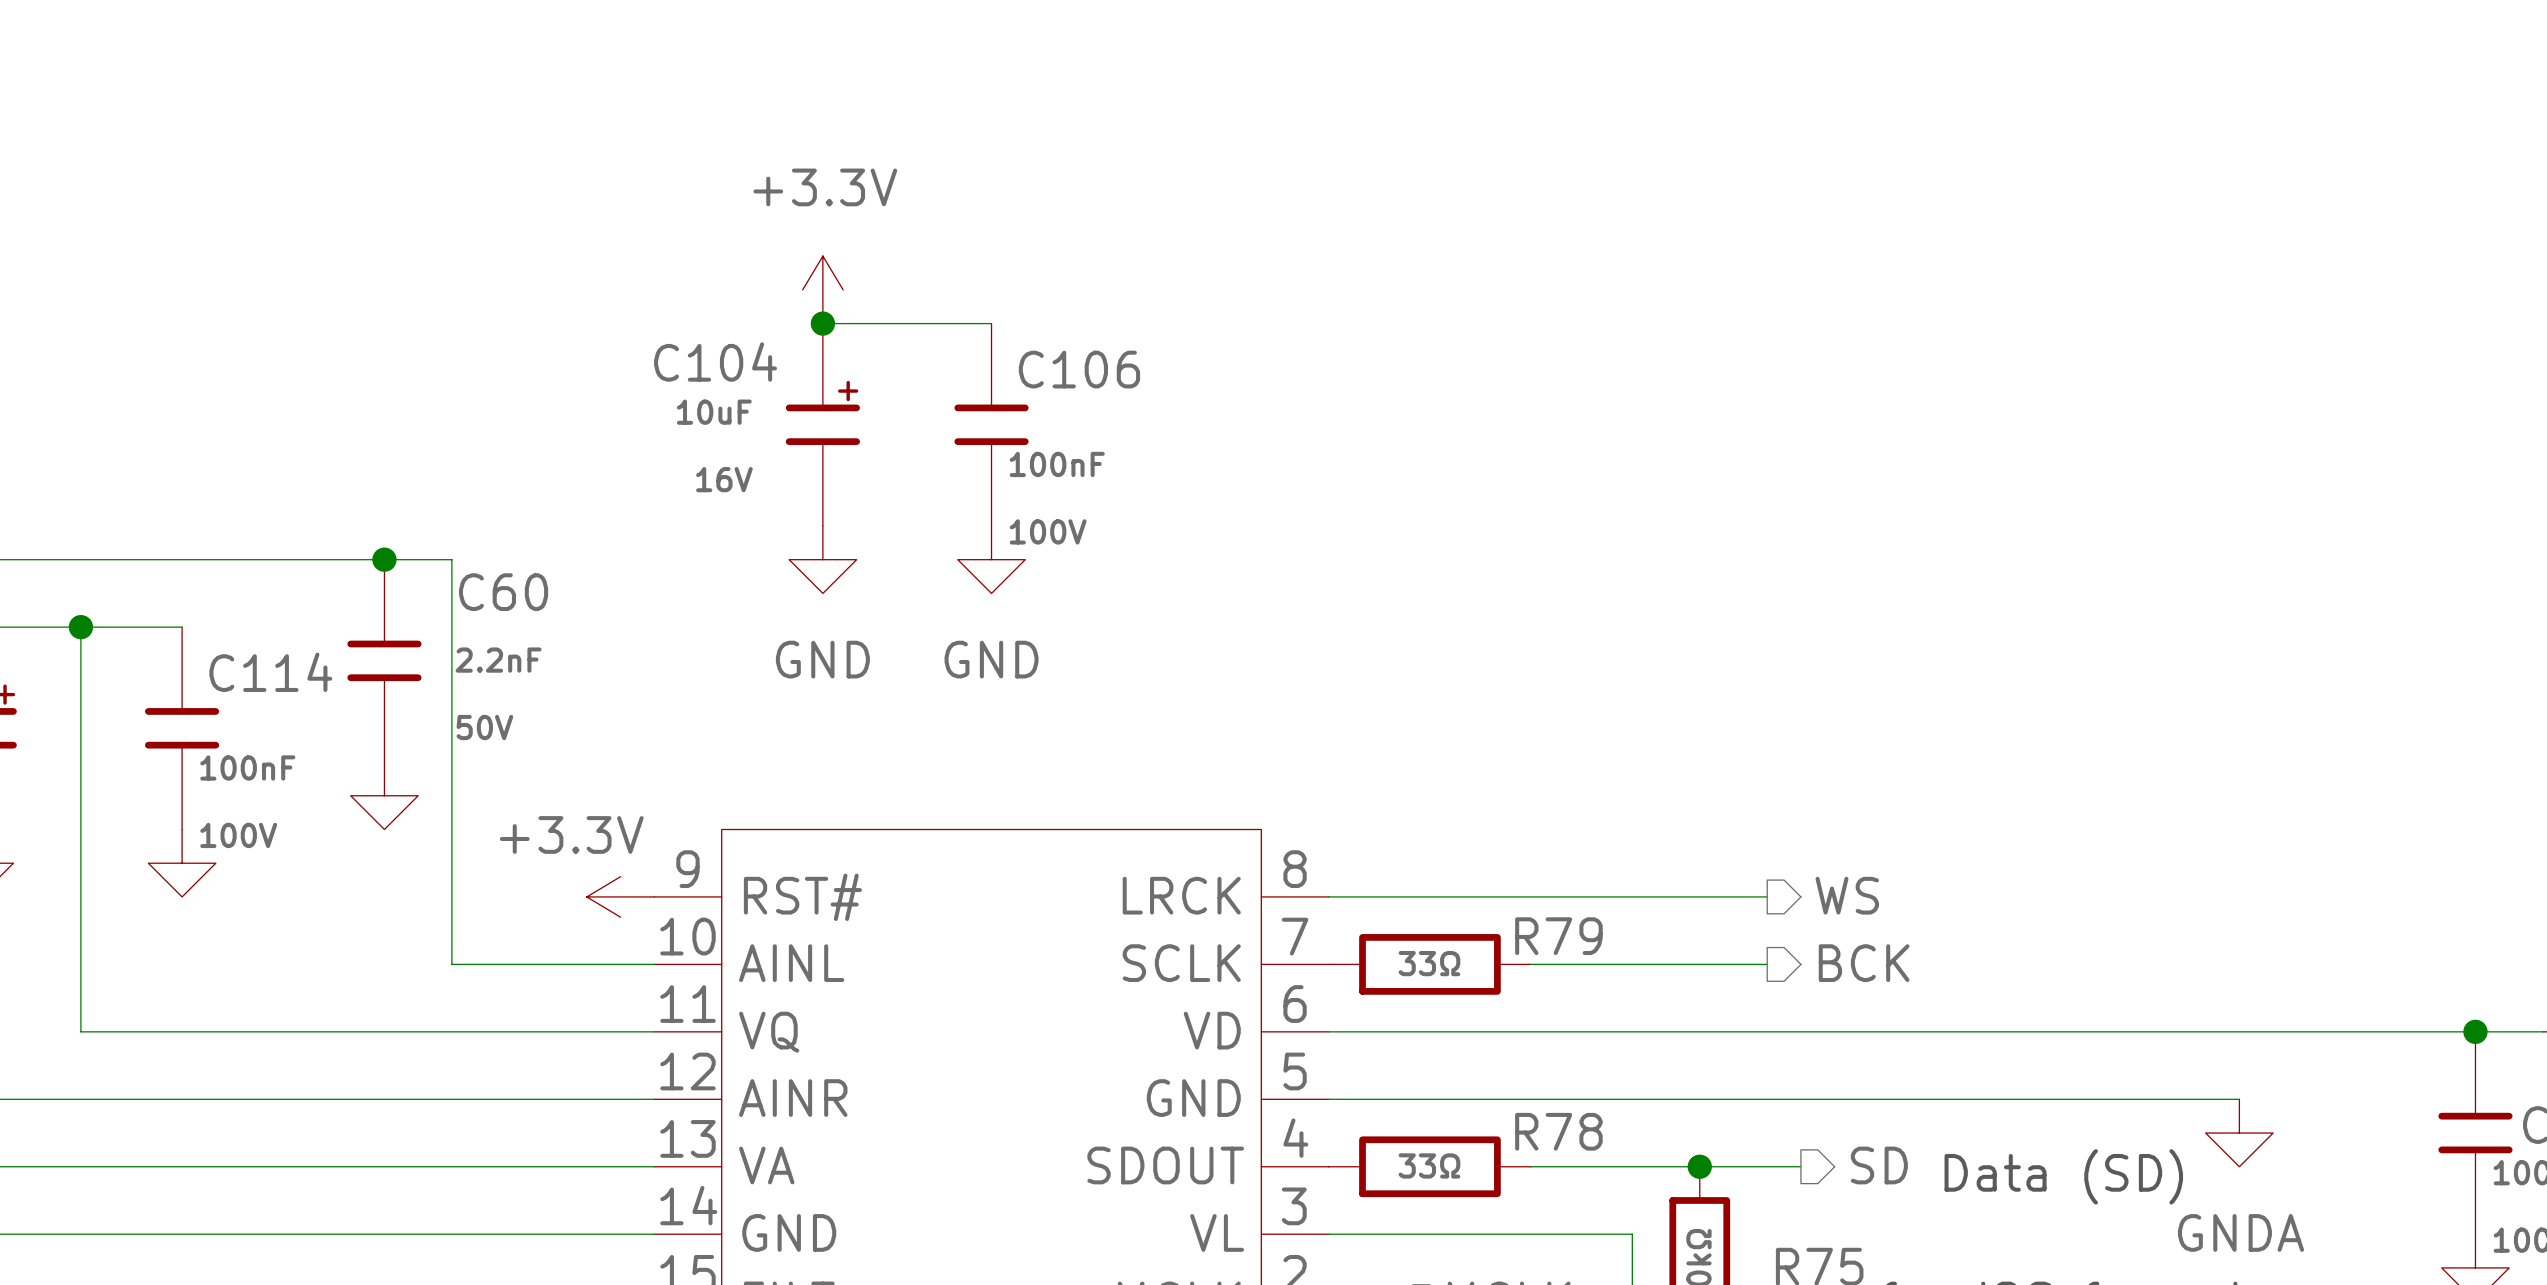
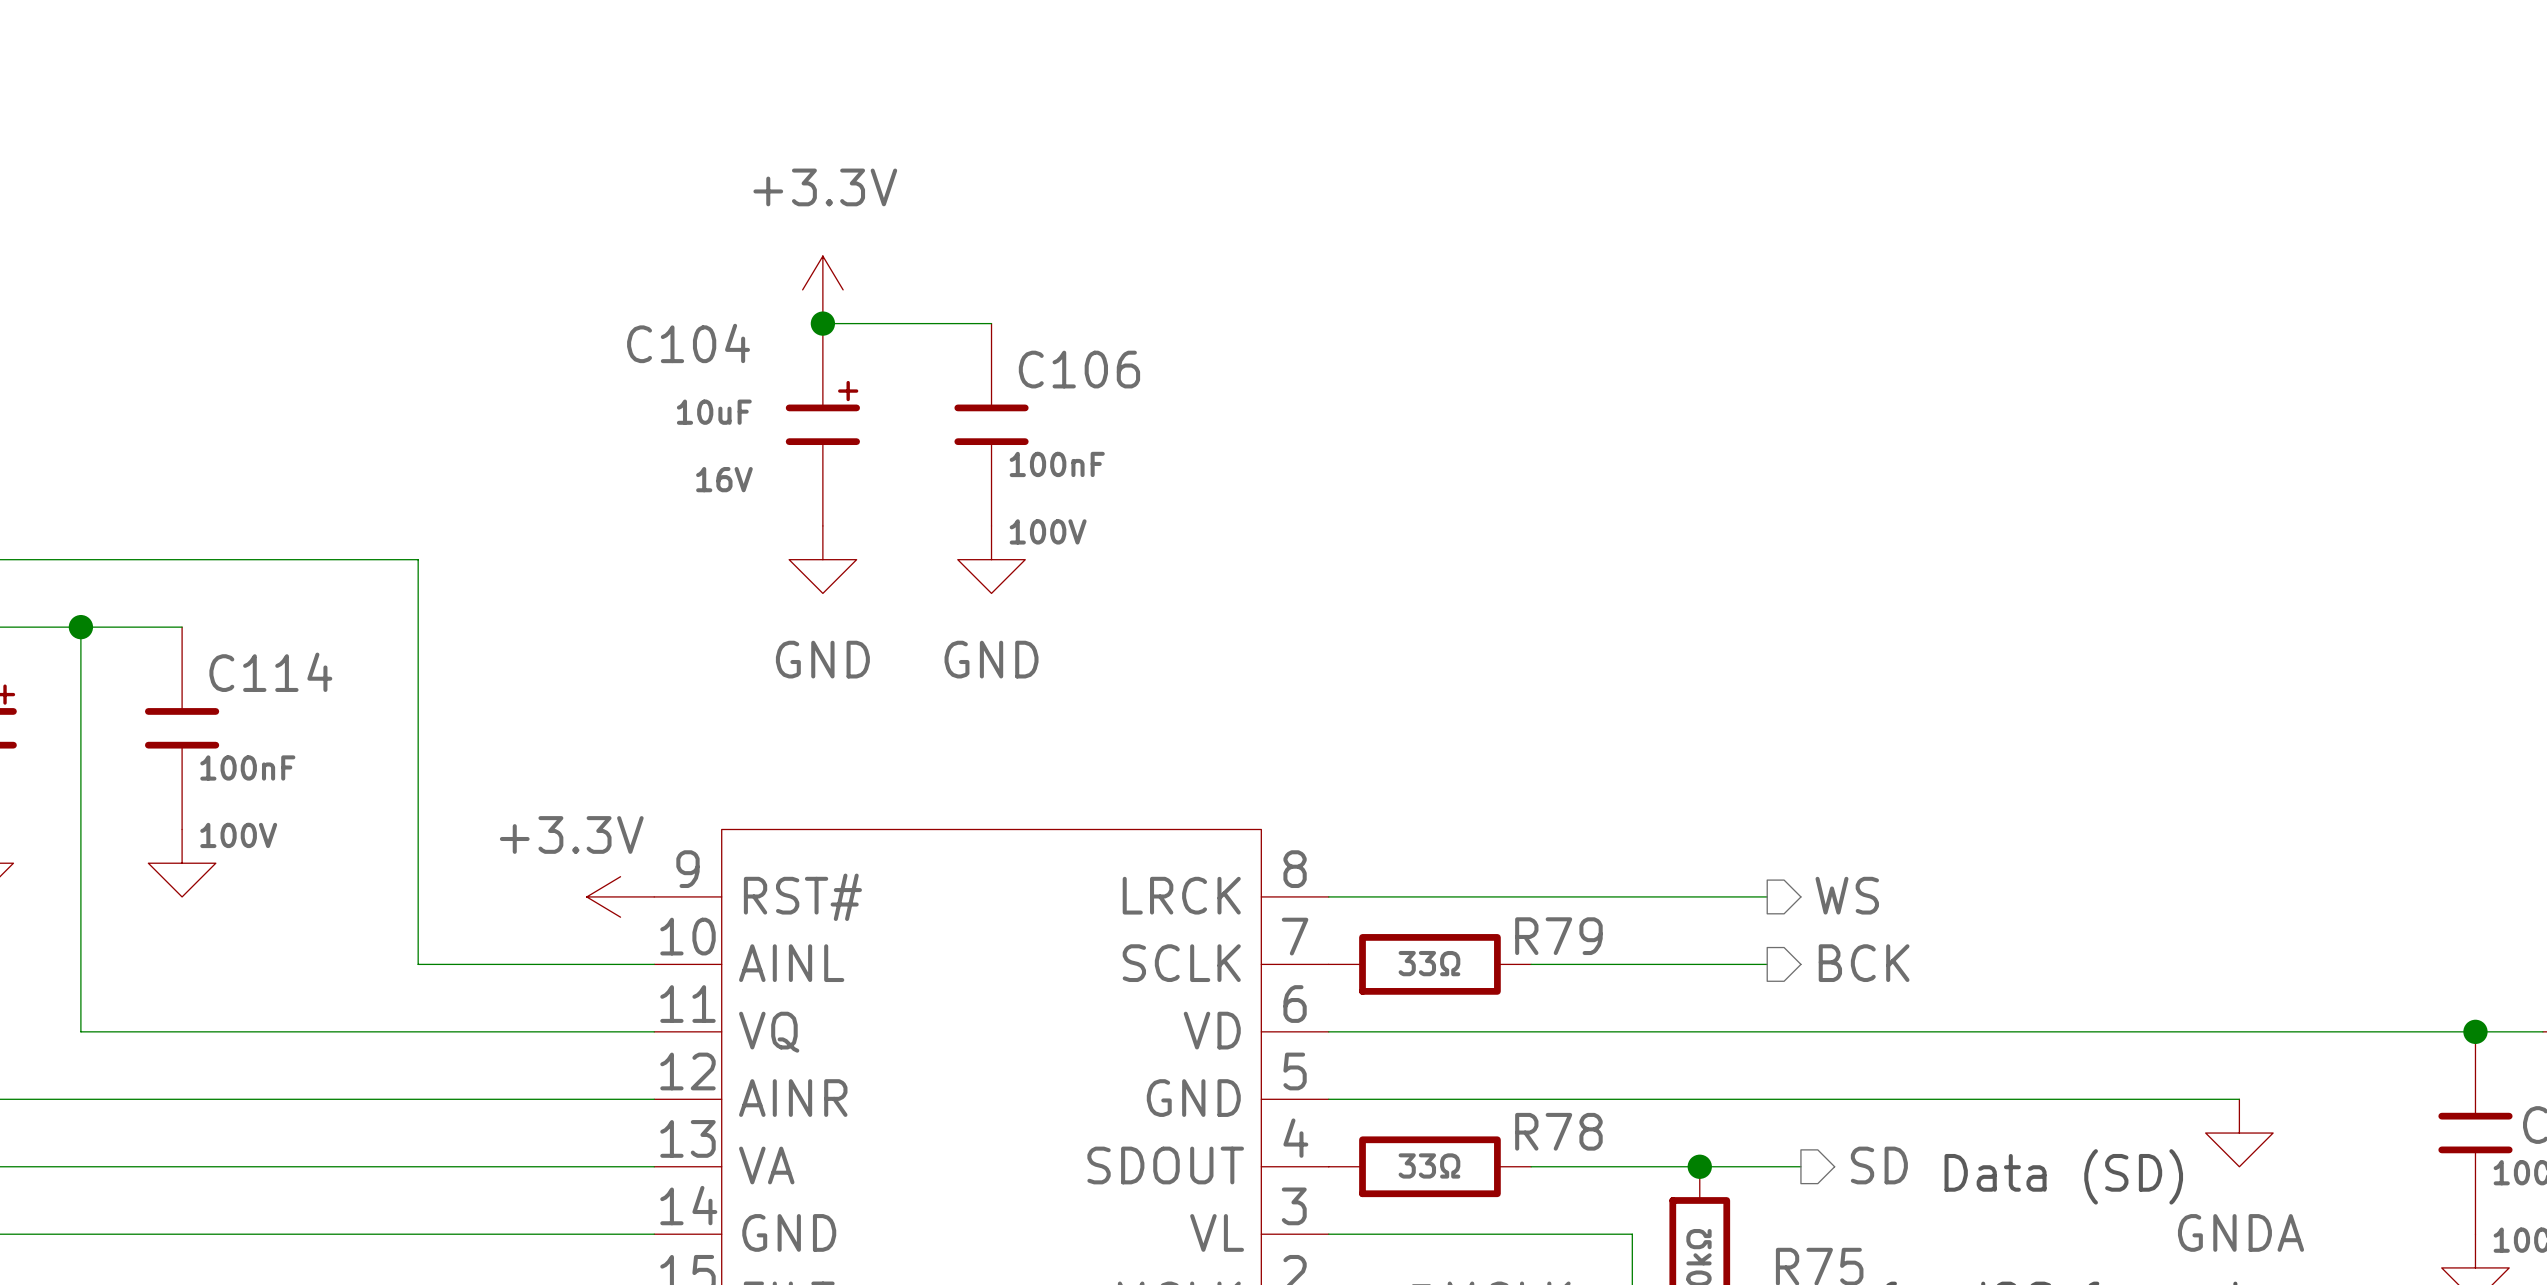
C104 name position: C104 (715, 362) -> C104 (688, 343)
junction: (384, 559) -> none
wire: (418, 559) (451, 559) (451, 964) -> (418, 559) (418, 964) (451, 964)
C60: 2.2nF (384, 660) -> none
power symbol: (384, 795) -> none

